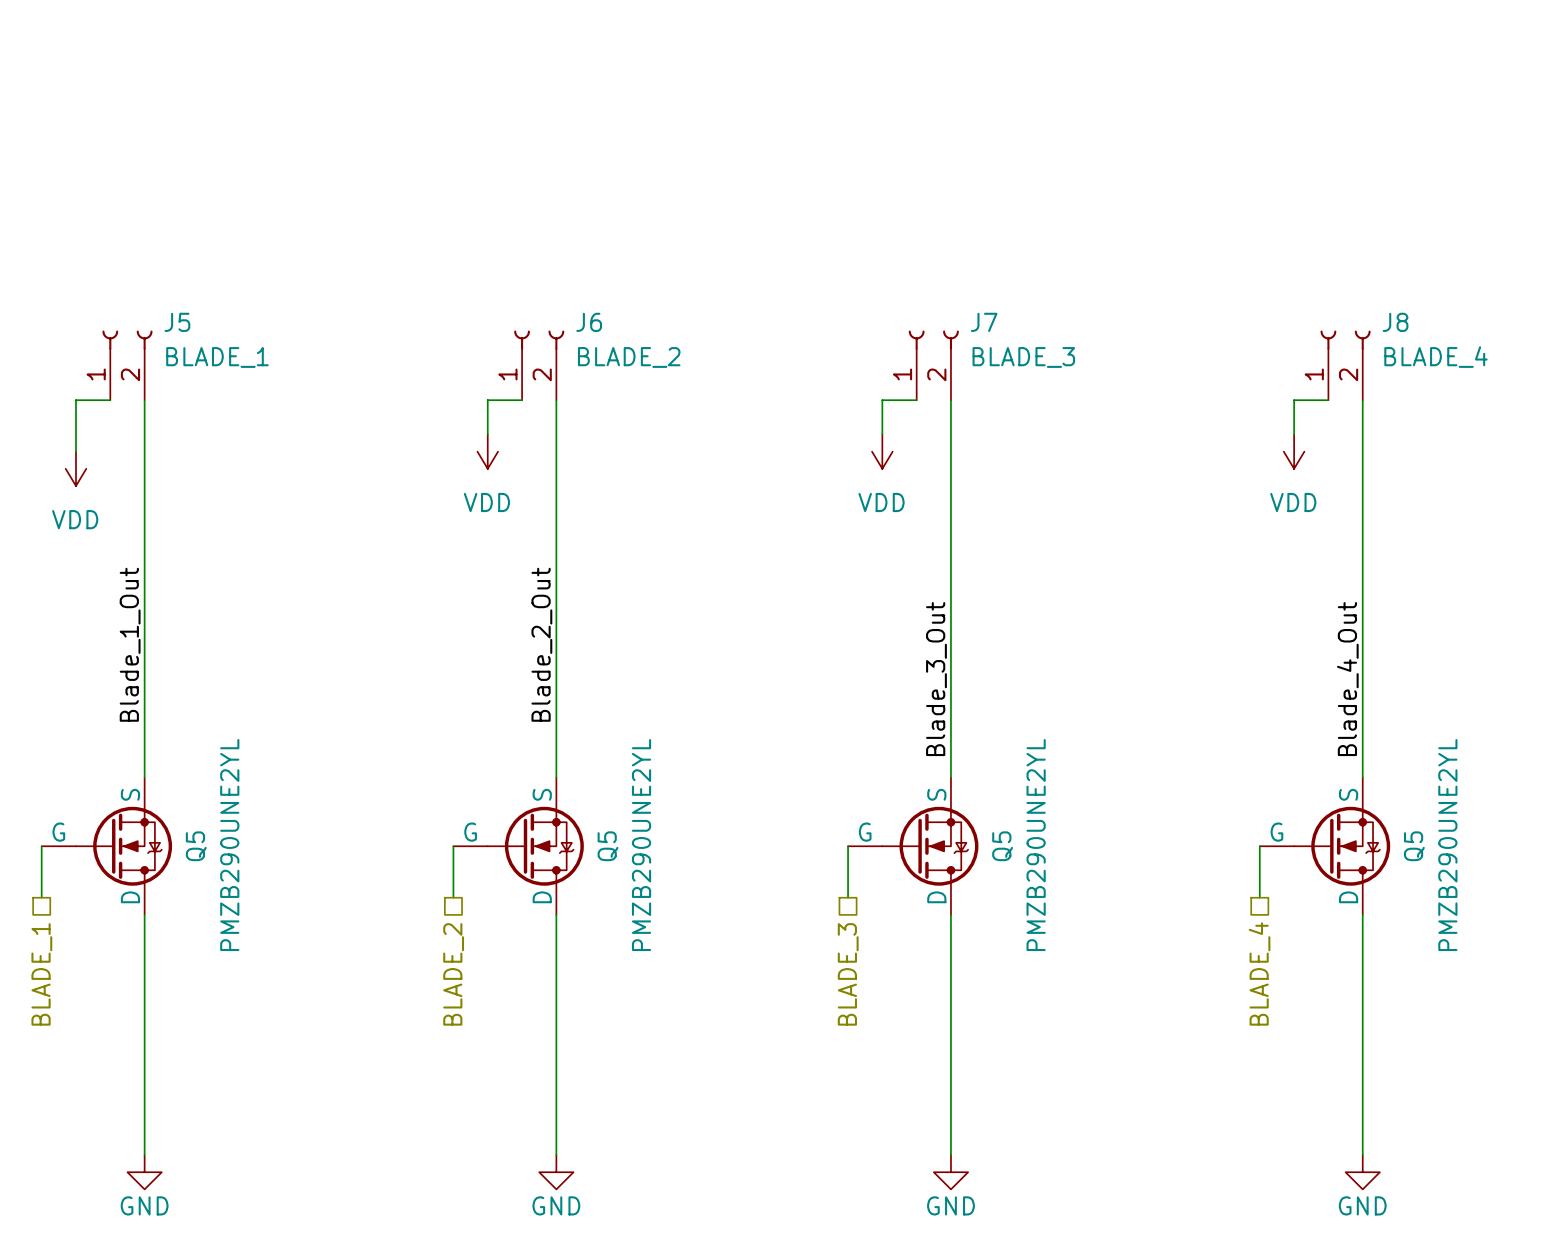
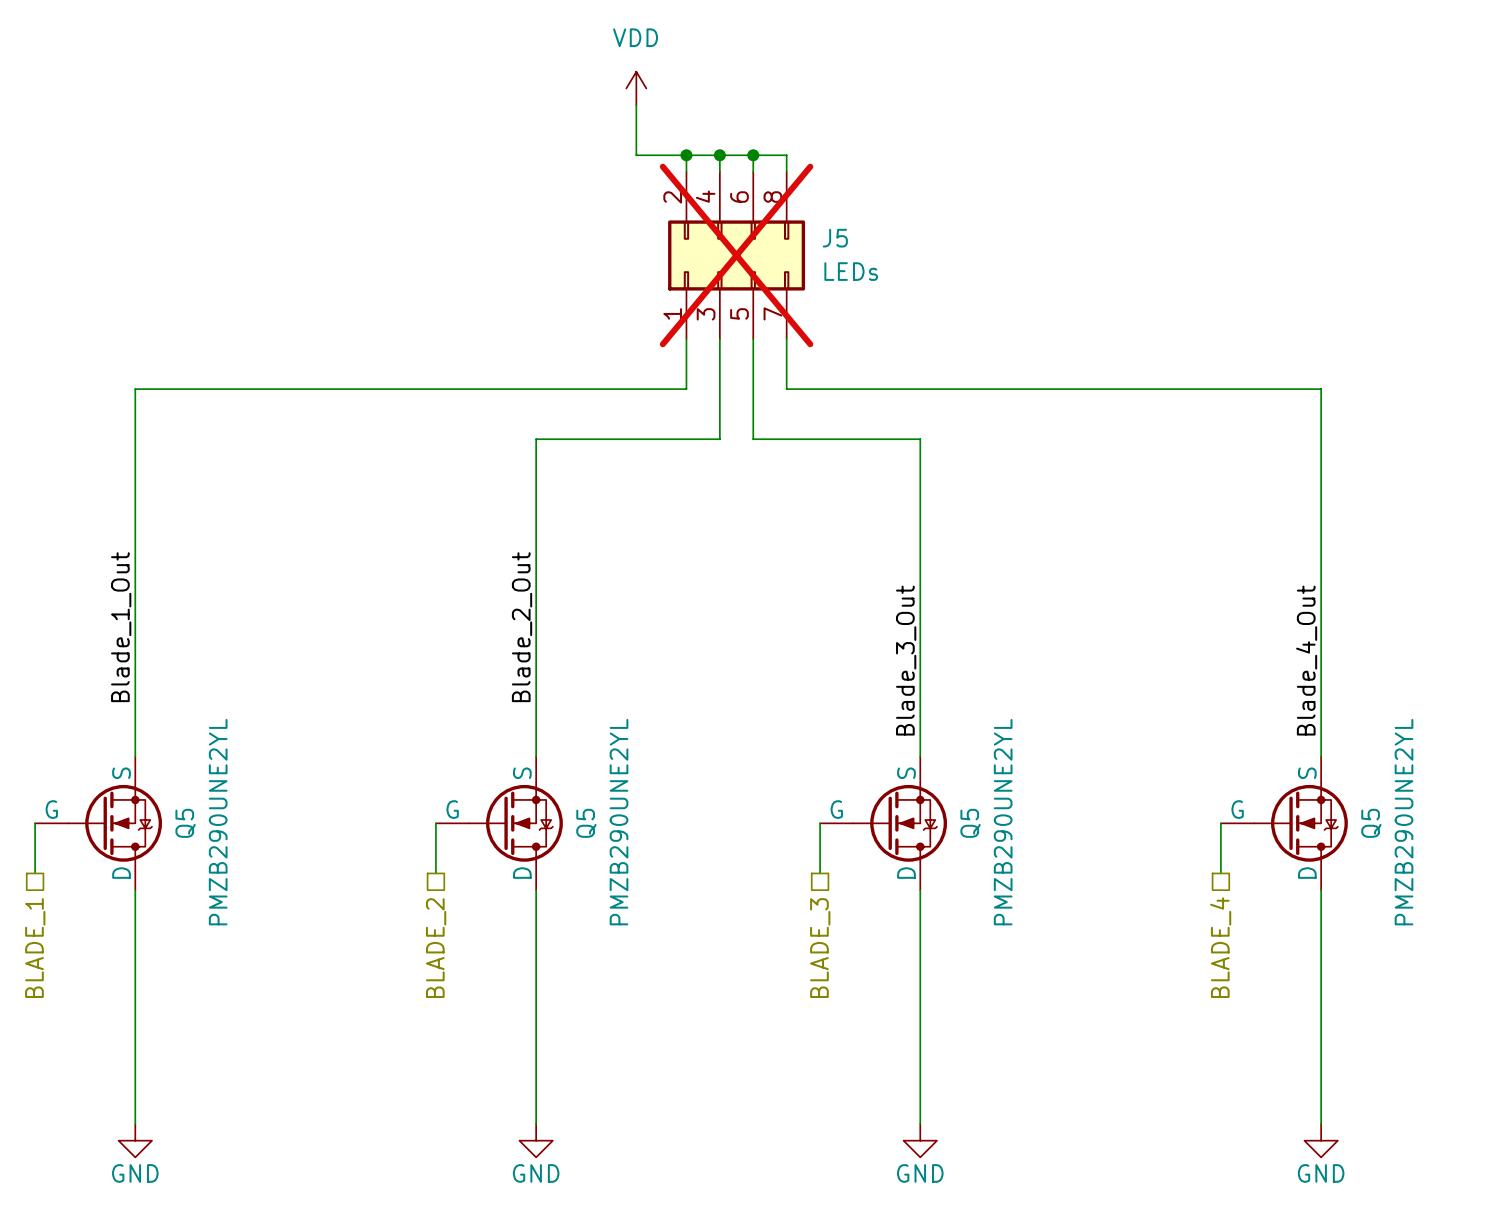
power symbol: none -> VDD (636, 88)
wire: none -> (636, 105) (636, 155) (786, 155) (786, 171)
wire: none -> (686, 155) (686, 171)
junction: none -> (686, 155)
wire: none -> (719, 155) (719, 171)
junction: none -> (719, 155)
wire: none -> (753, 155) (753, 171)
junction: none -> (753, 155)
J5 do-not-place cross: none -> (736, 255)
J5 name position: J5 (177, 322) -> J5 (835, 238)
J5 symbol: [102, 330, 153, 401] -> [668, 171, 806, 339]
wire: none -> (686, 338) (686, 389) (502, 389)
J5 value: BLADE_1 (217, 357) -> LEDs (851, 271)
J6: BLADE_2 (539, 365) -> none
J7: BLADE_3 (933, 365) -> none
J8: BLADE_4 (1345, 365) -> none
wire: (110, 400) (75, 400) (75, 451) -> none
wire: (487, 400) (487, 434) -> (469, 389) (135, 389)
wire: (556, 400) (556, 451) -> (719, 338) (719, 439) (536, 439)
wire: (882, 400) (882, 434) -> (853, 389) (786, 389) (786, 338)
wire: (950, 400) (950, 451) -> (753, 338) (753, 439) (920, 439)
wire: (1294, 400) (1294, 434) -> (1254, 389) (886, 389)
wire: none -> (1287, 389) (1321, 389)
power symbol: VDD (487, 451) -> none
power symbol: VDD (882, 451) -> none
power symbol: VDD (1294, 451) -> none
power symbol: VDD (75, 468) -> none

